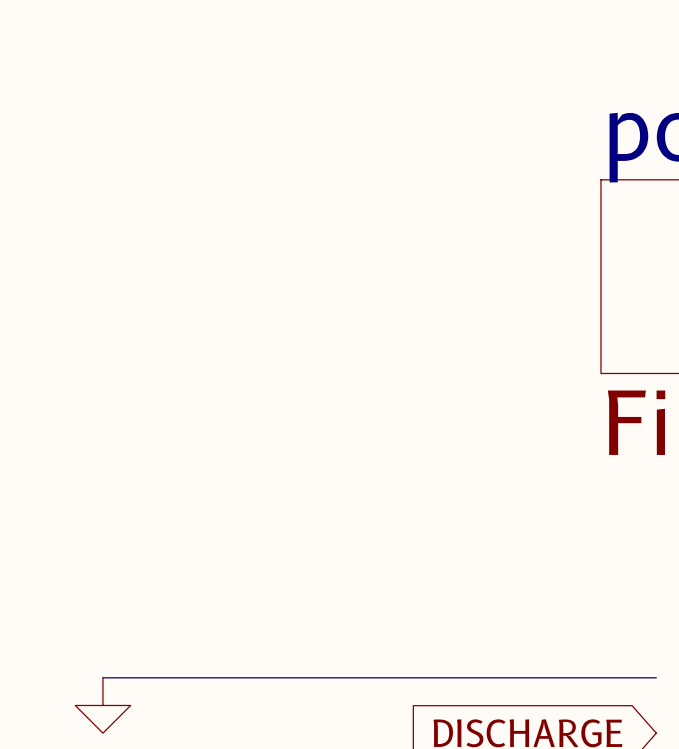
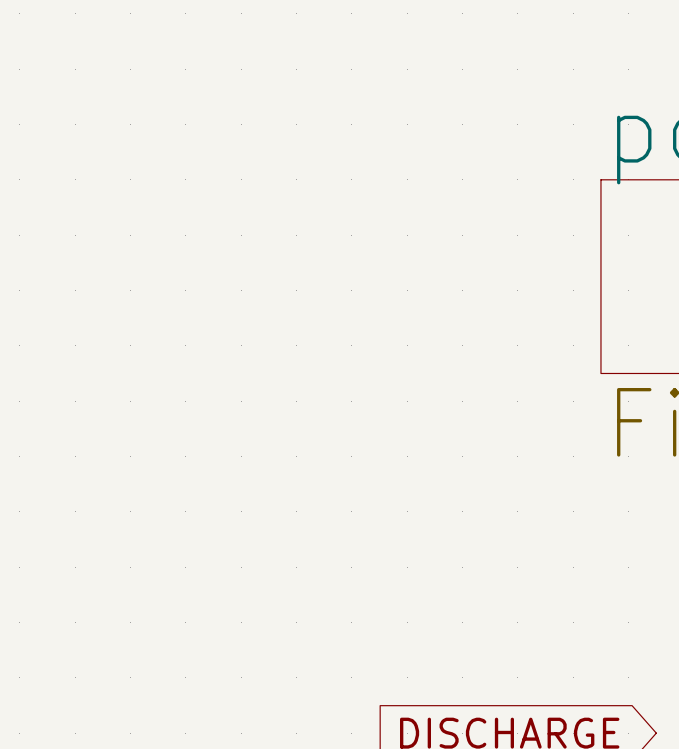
wire: (102, 677) (656, 677) -> none
power symbol: (102, 705) -> none

